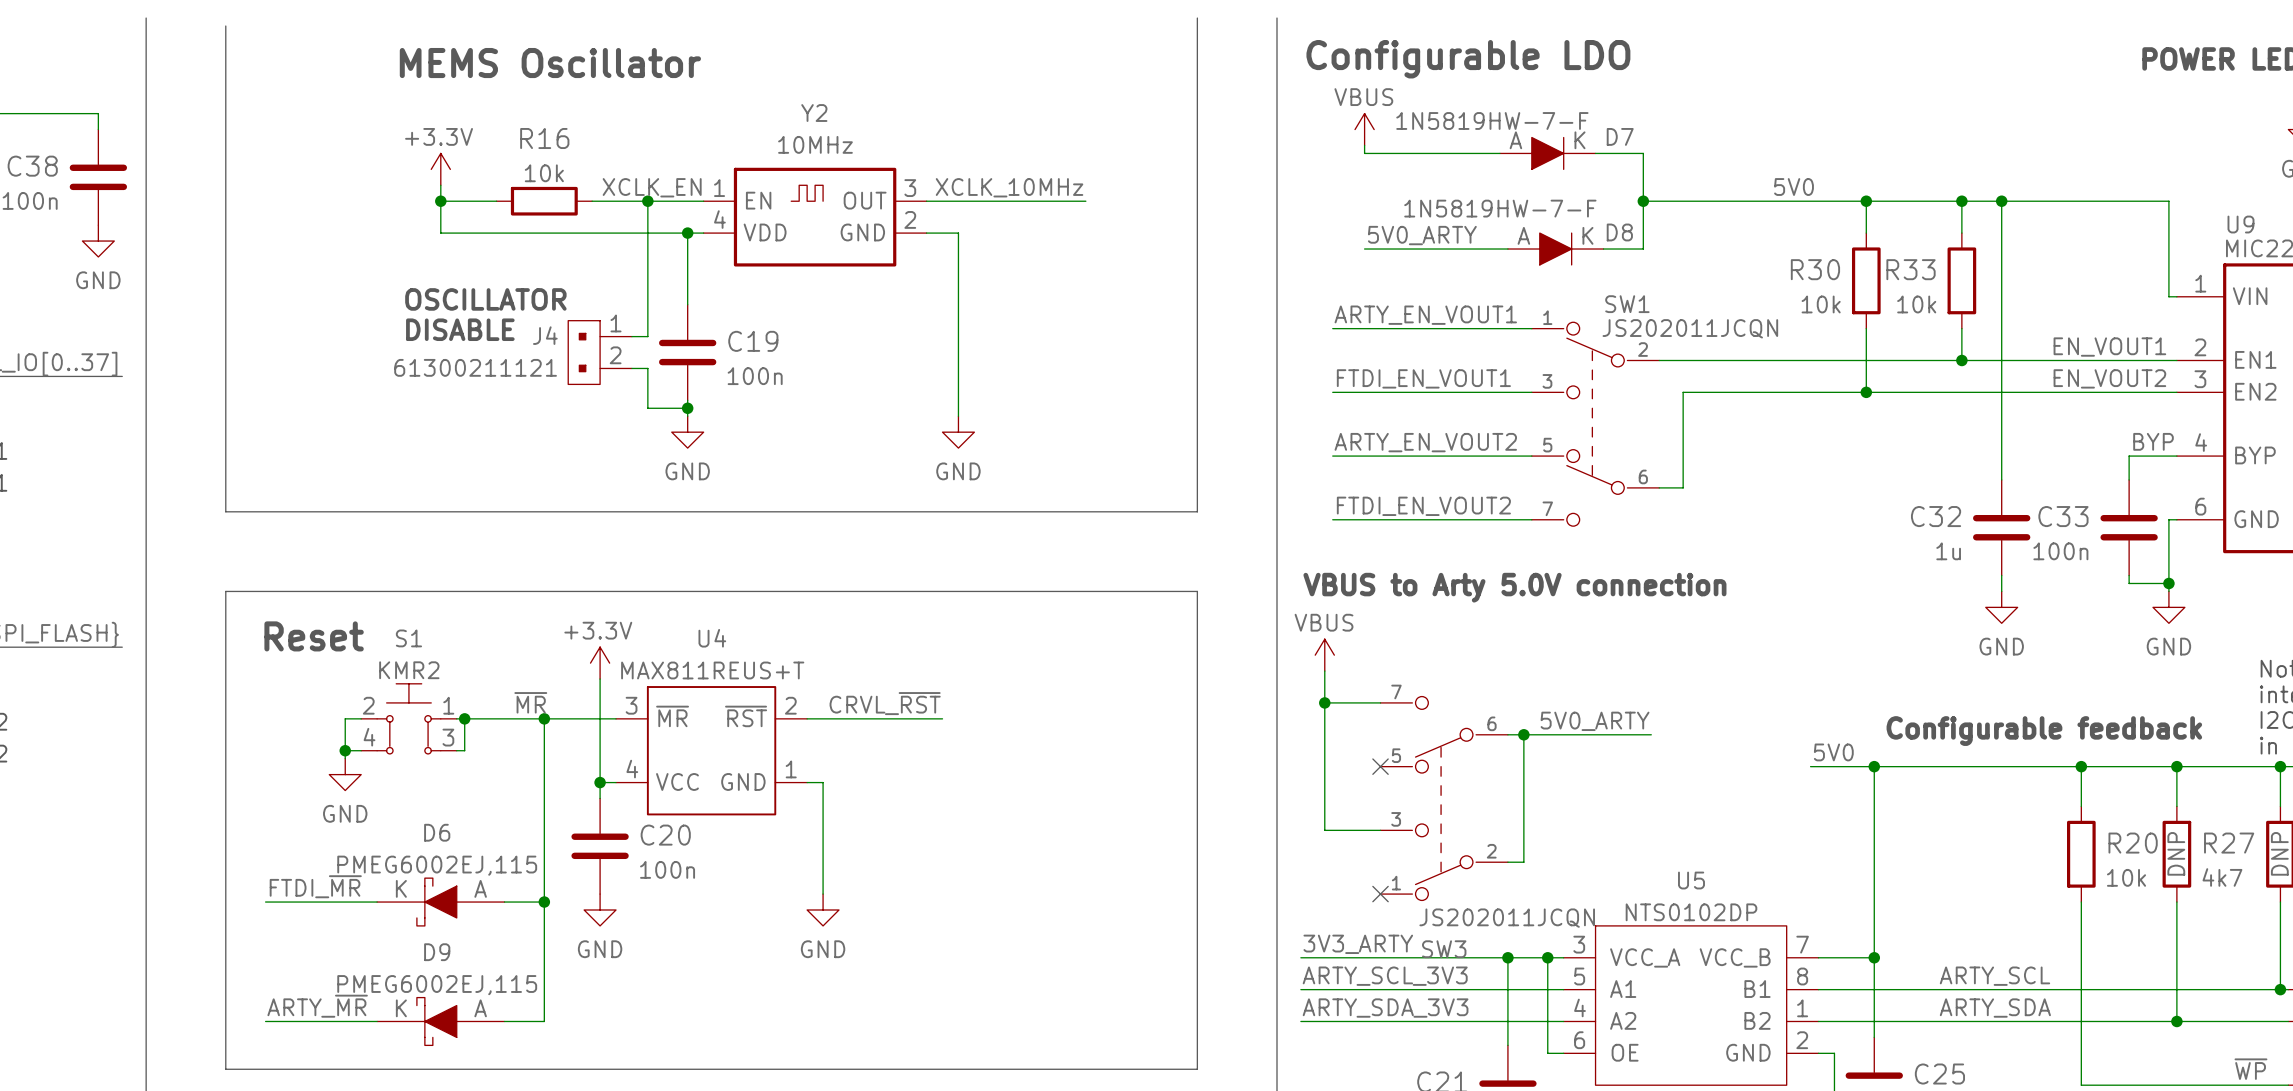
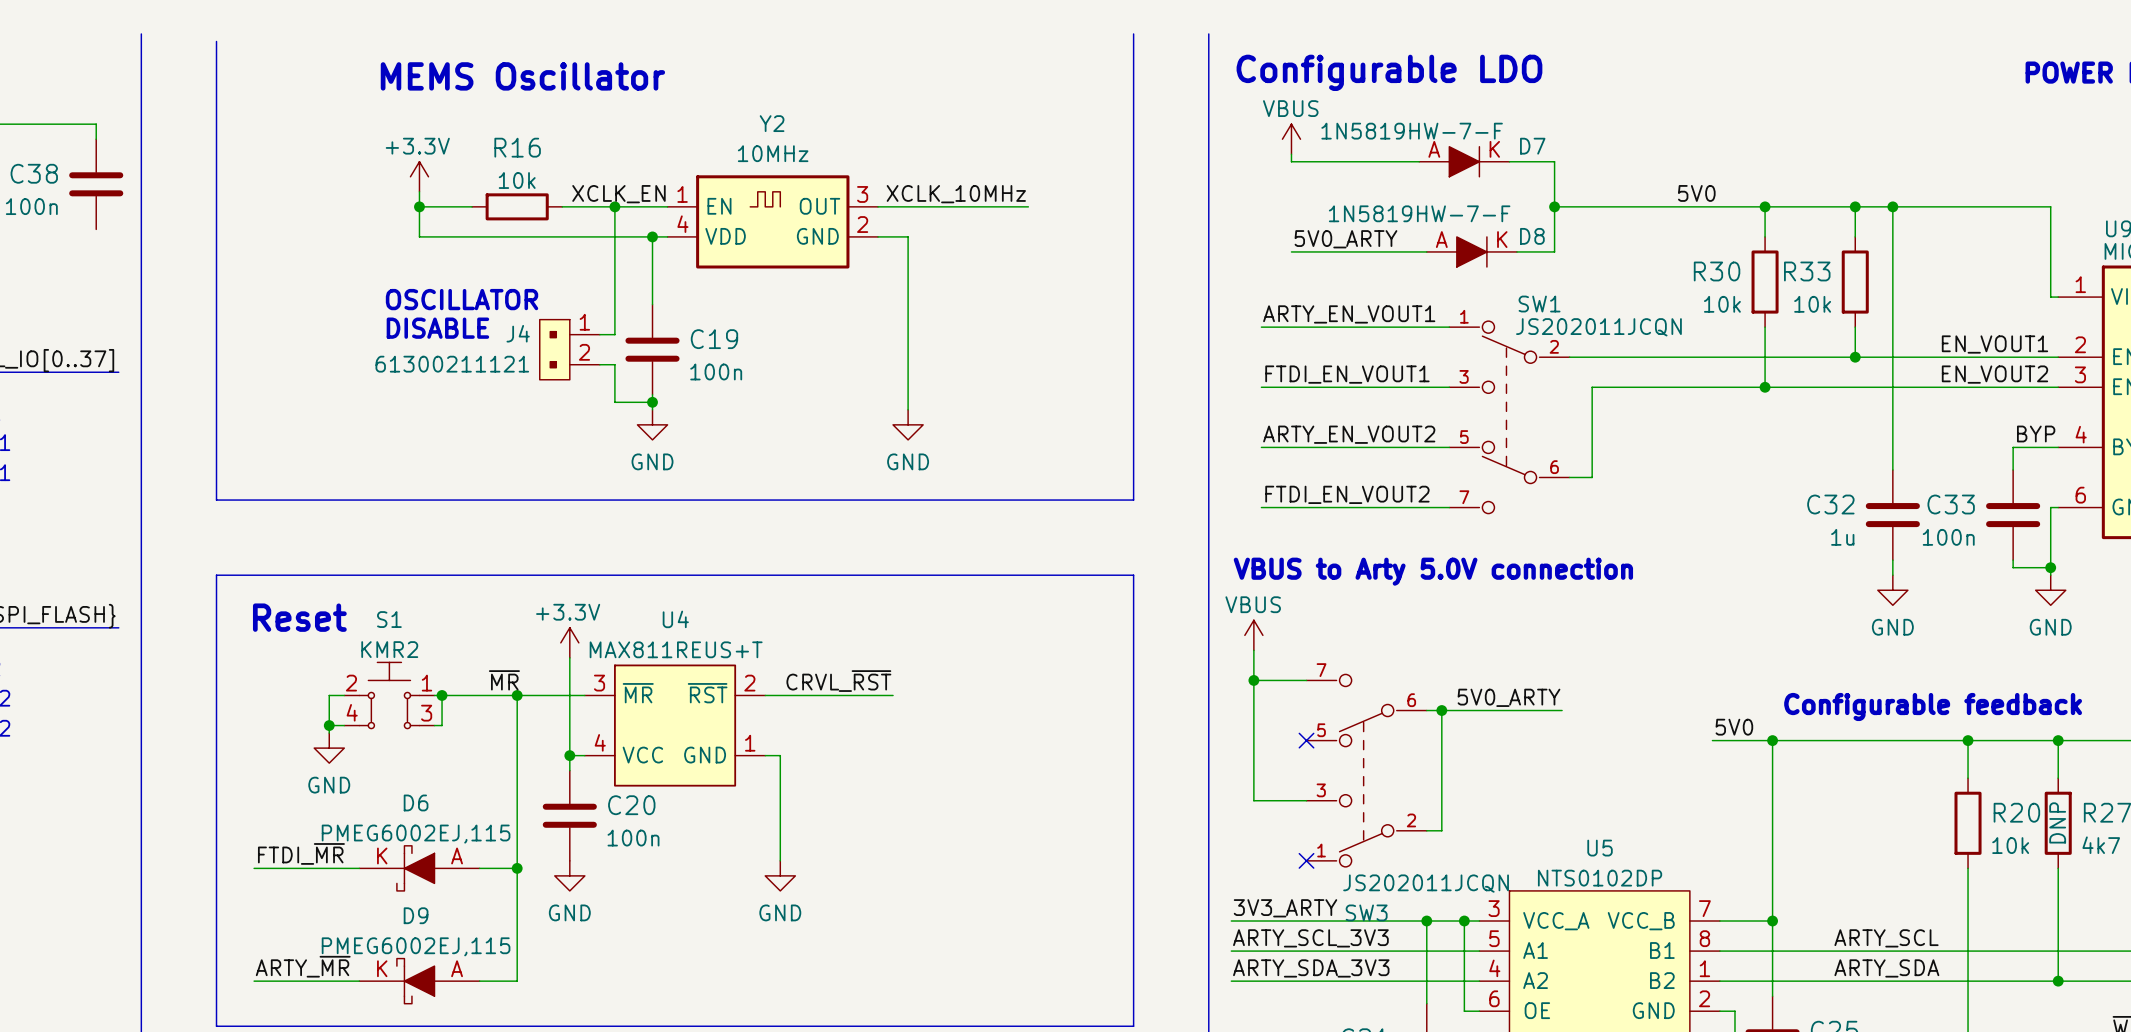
power symbol: GND (98, 241) -> none

